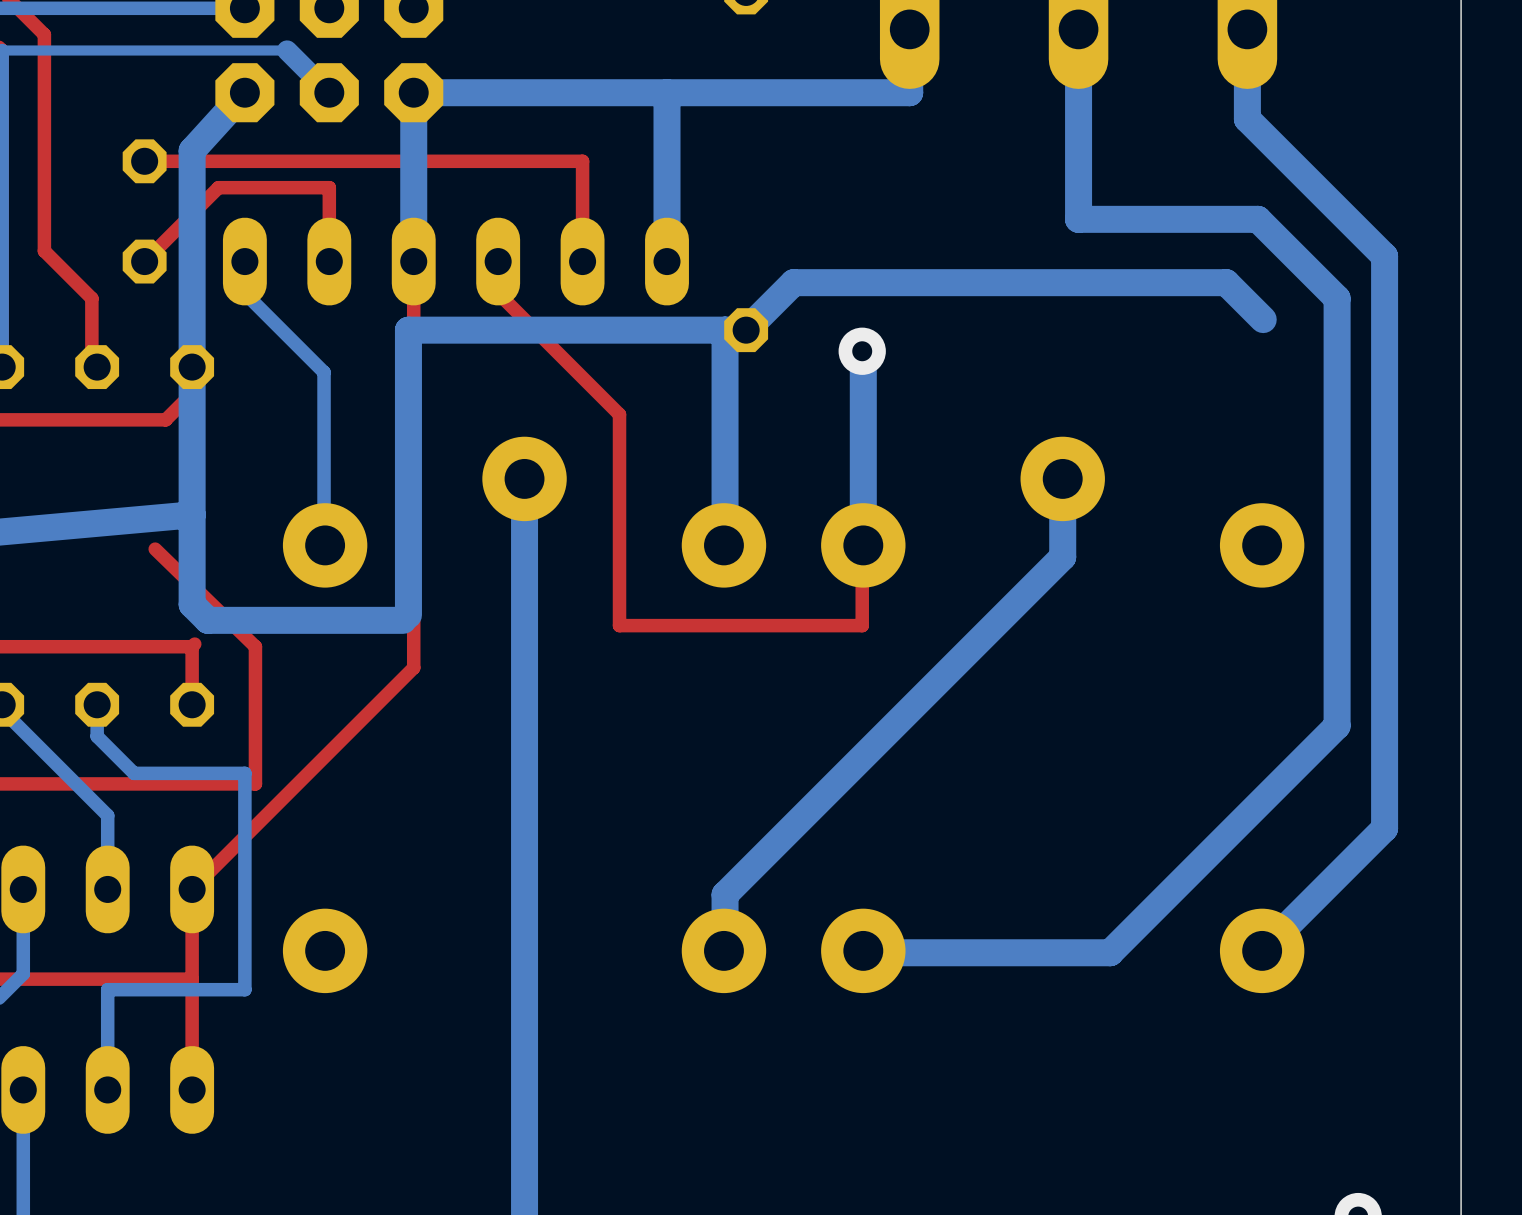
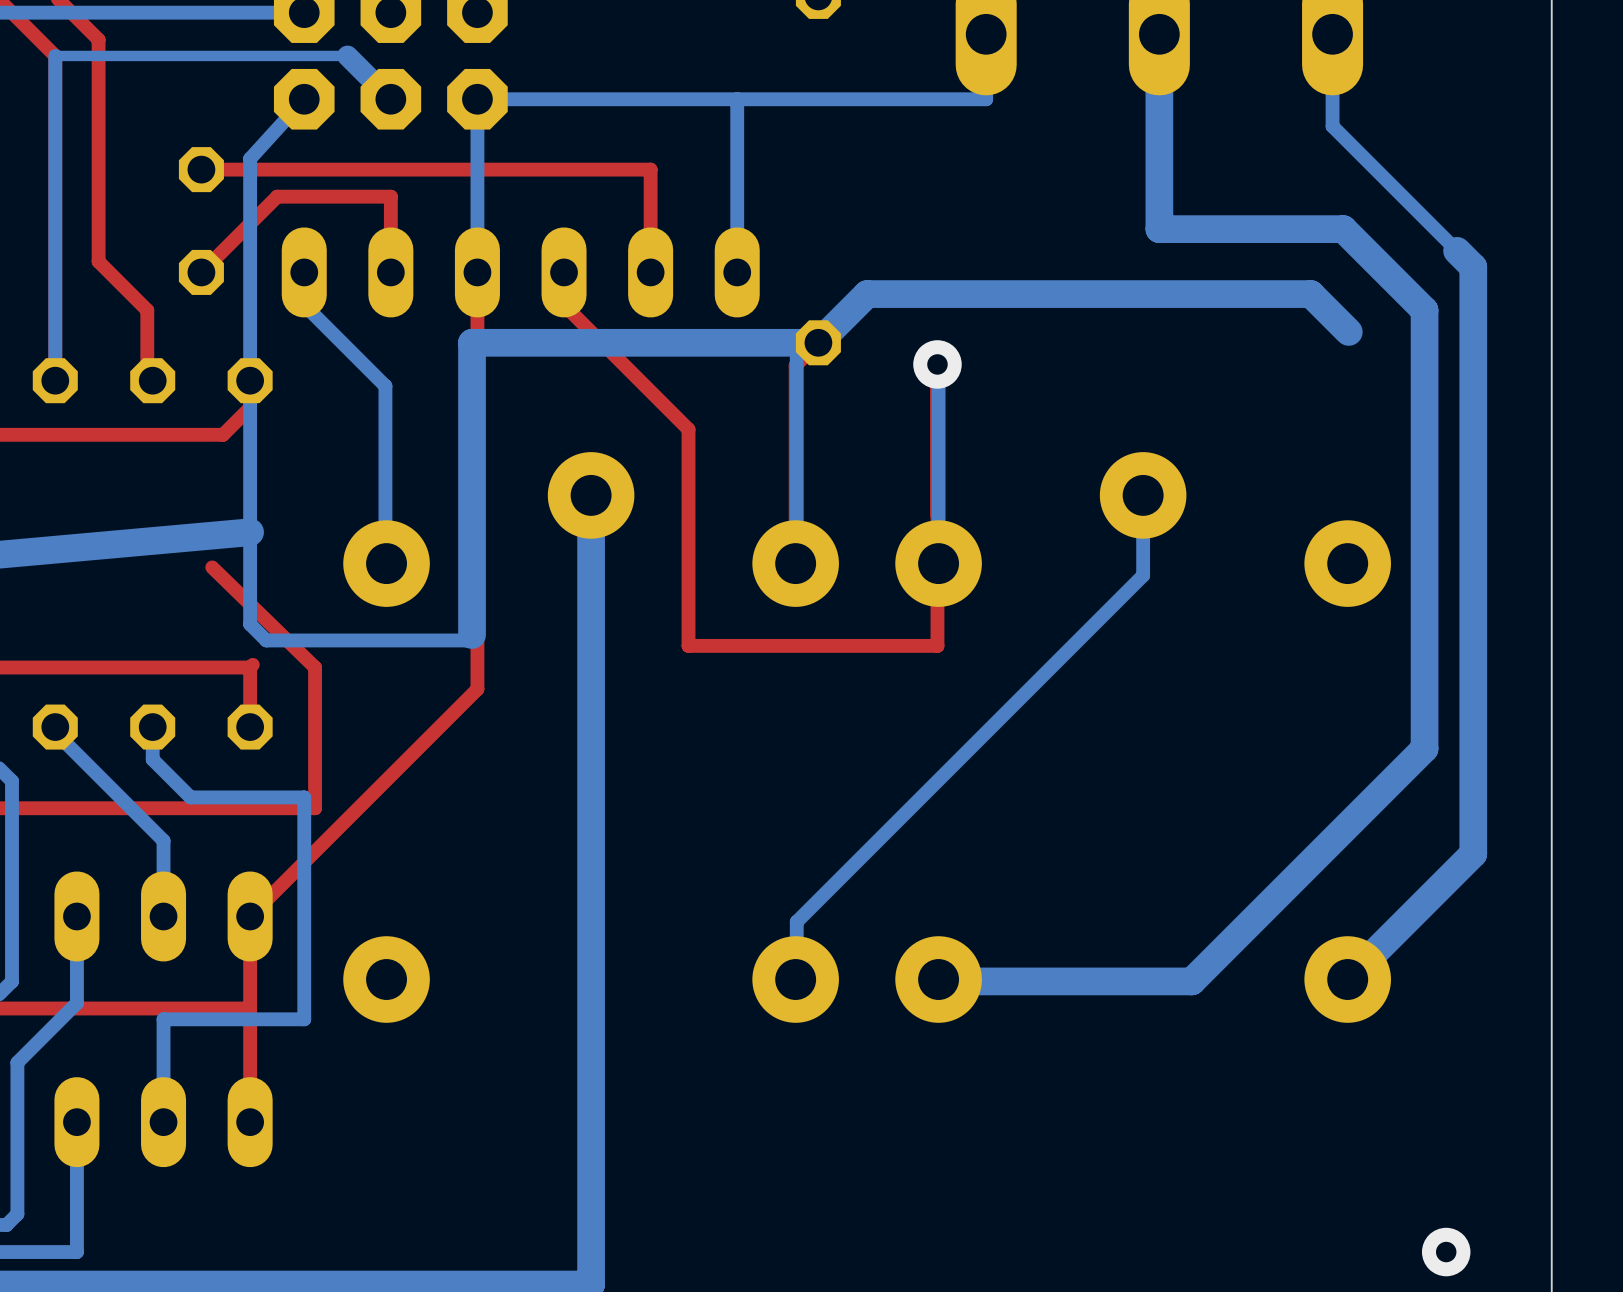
bottom track width: thick (909, 29) (909, 92) (413, 92) (413, 261) -> thin (986, 34) (986, 99) (477, 99) (477, 272)
bottom track width: thick (1247, 29) (1247, 119) (1368, 240) -> thin (1332, 34) (1332, 126) (1457, 250)
bottom track width: thick (244, 92) (192, 150) (192, 604) (207, 620) (403, 620) -> thin (304, 99) (250, 158) (250, 624) (266, 640) (466, 640)
bottom track width: thick (667, 92) (667, 261) -> thin (737, 99) (737, 272)
bottom track width: thick (725, 330) (725, 541) -> thin (796, 342) (796, 559)
bottom track width: thick (863, 352) (863, 545) -> thin (938, 365) (938, 563)
bottom track width: thick (1062, 478) (1062, 557) (725, 894) (723, 950) -> thin (1143, 495) (1143, 575) (796, 921) (795, 979)

